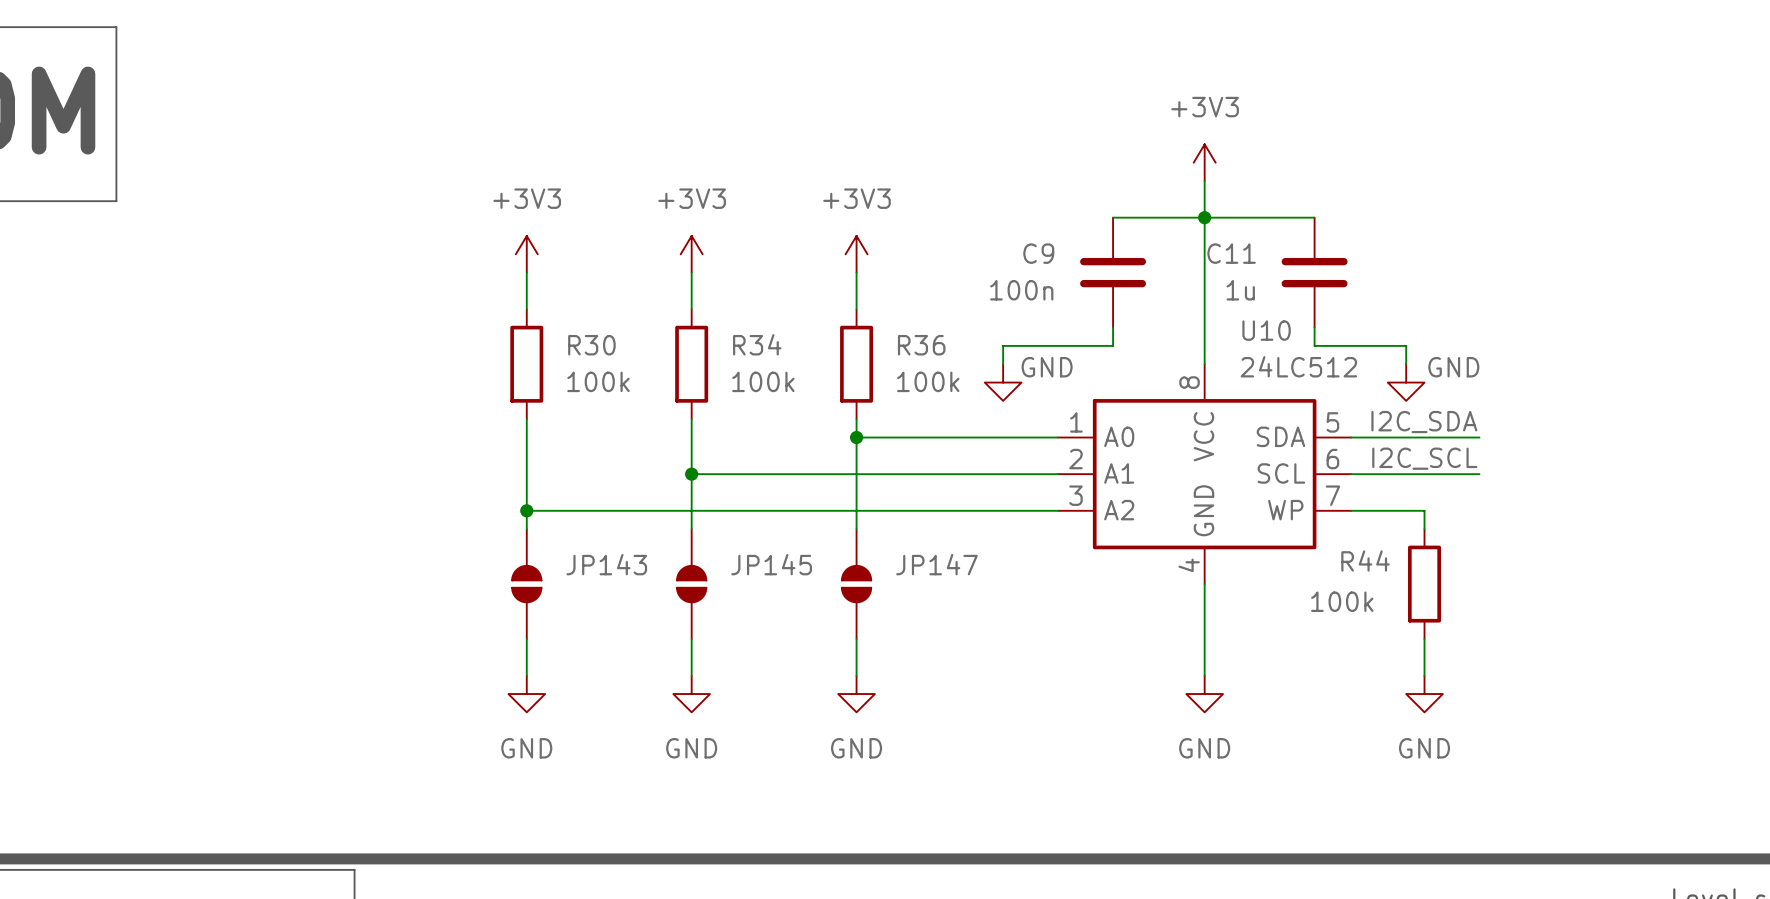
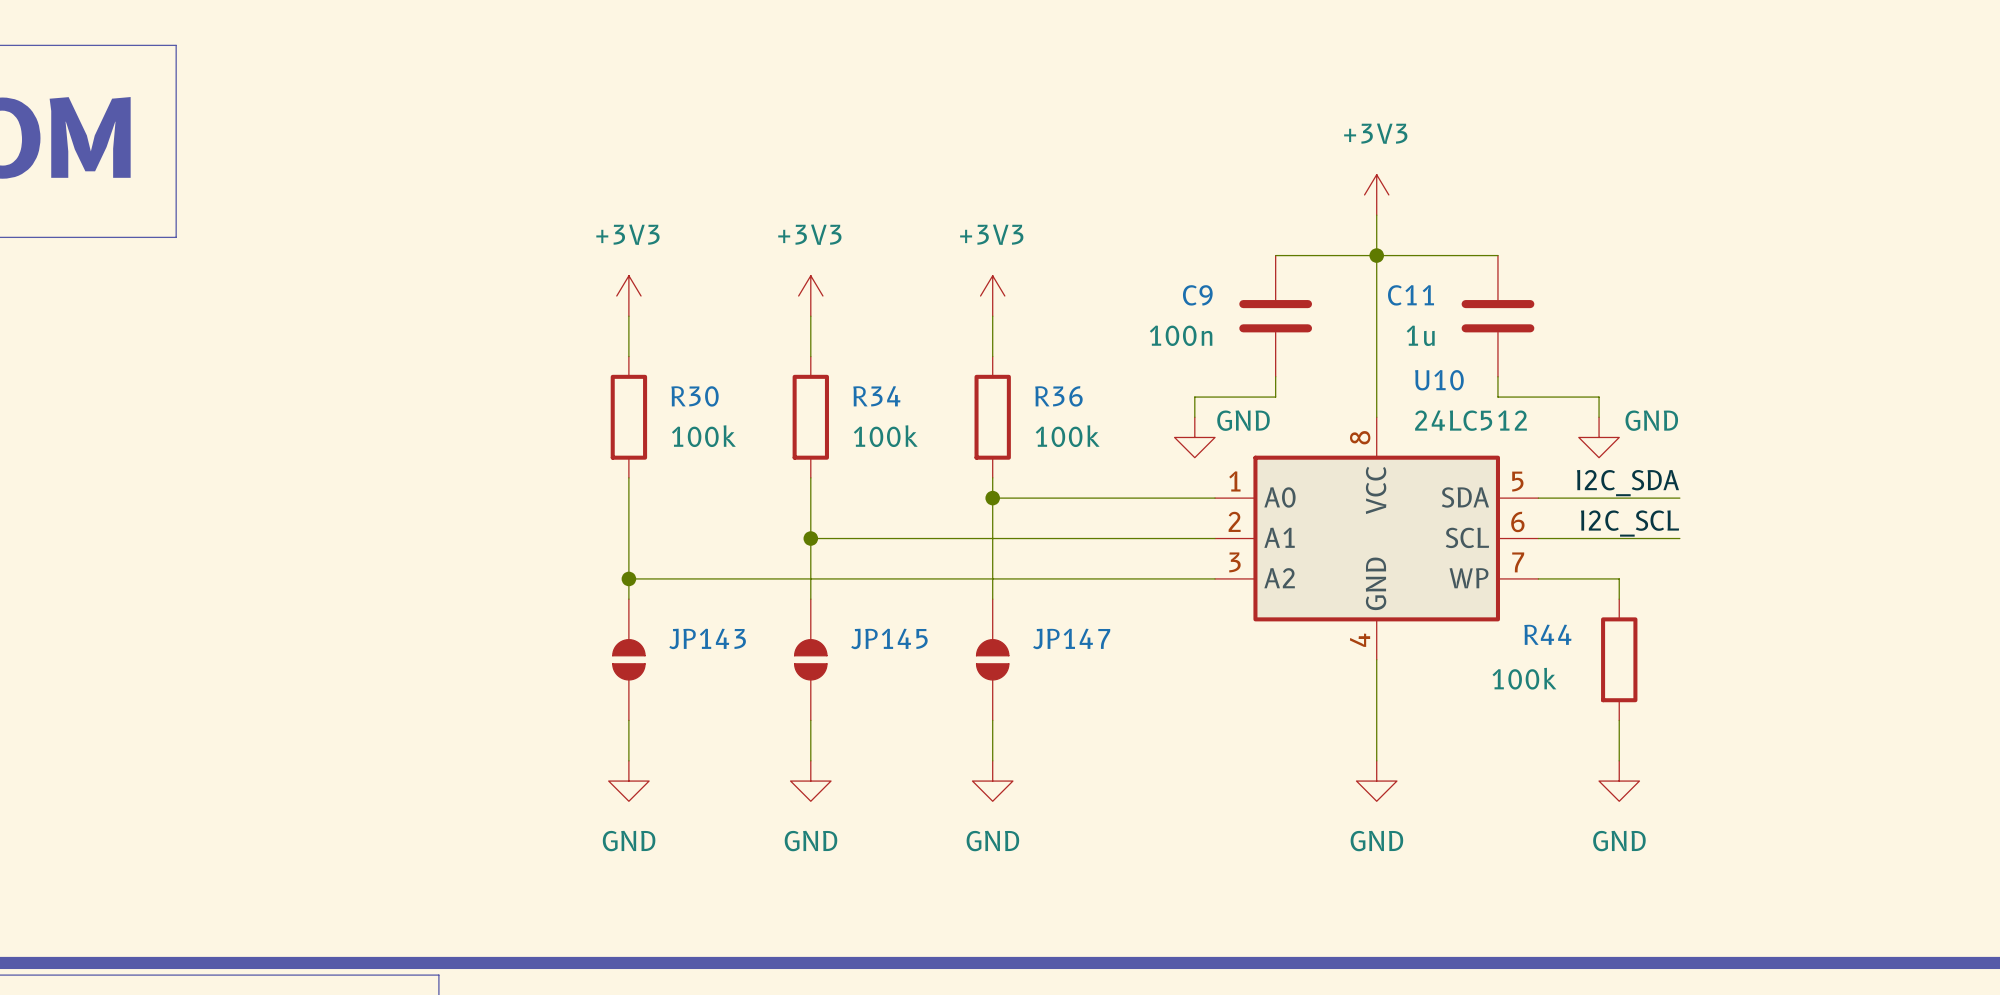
wire: (1039, 345) (1003, 345) (1003, 364) -> (1194, 397) (1194, 417)
power symbol position: GND (1003, 382) -> GND (1194, 437)

